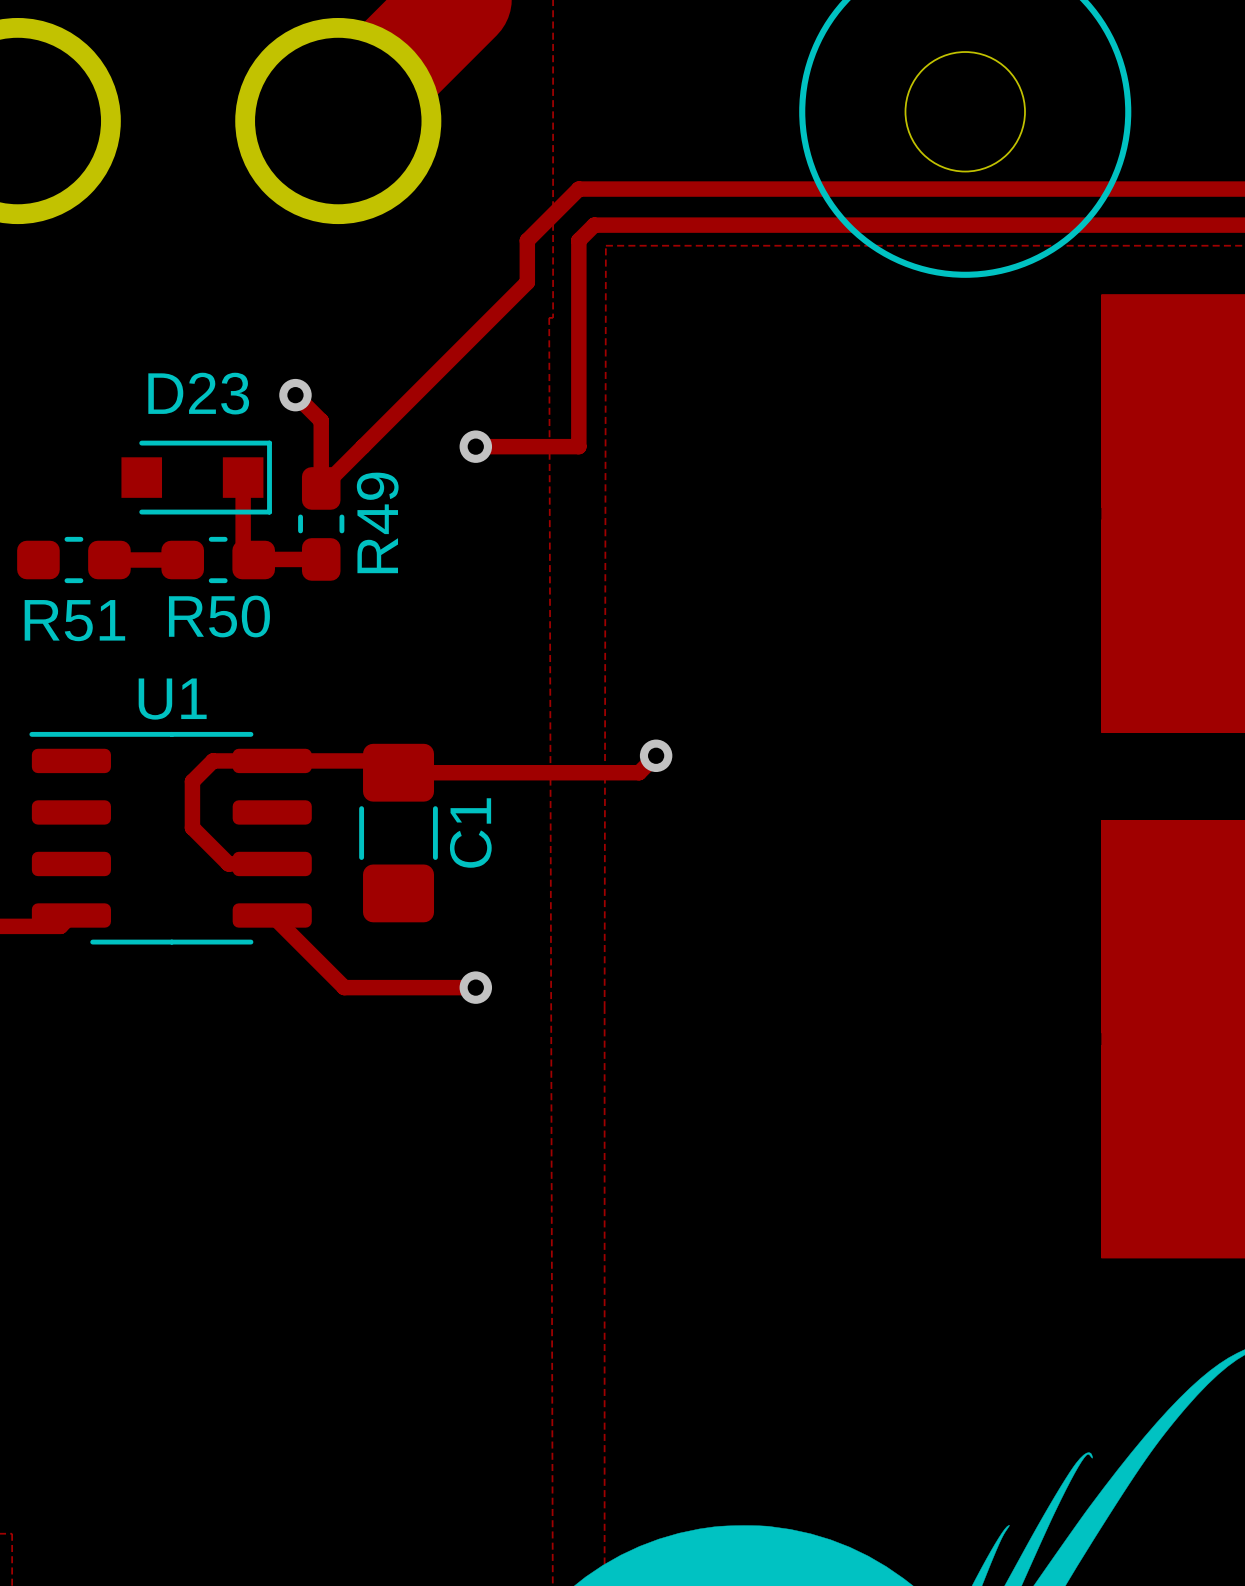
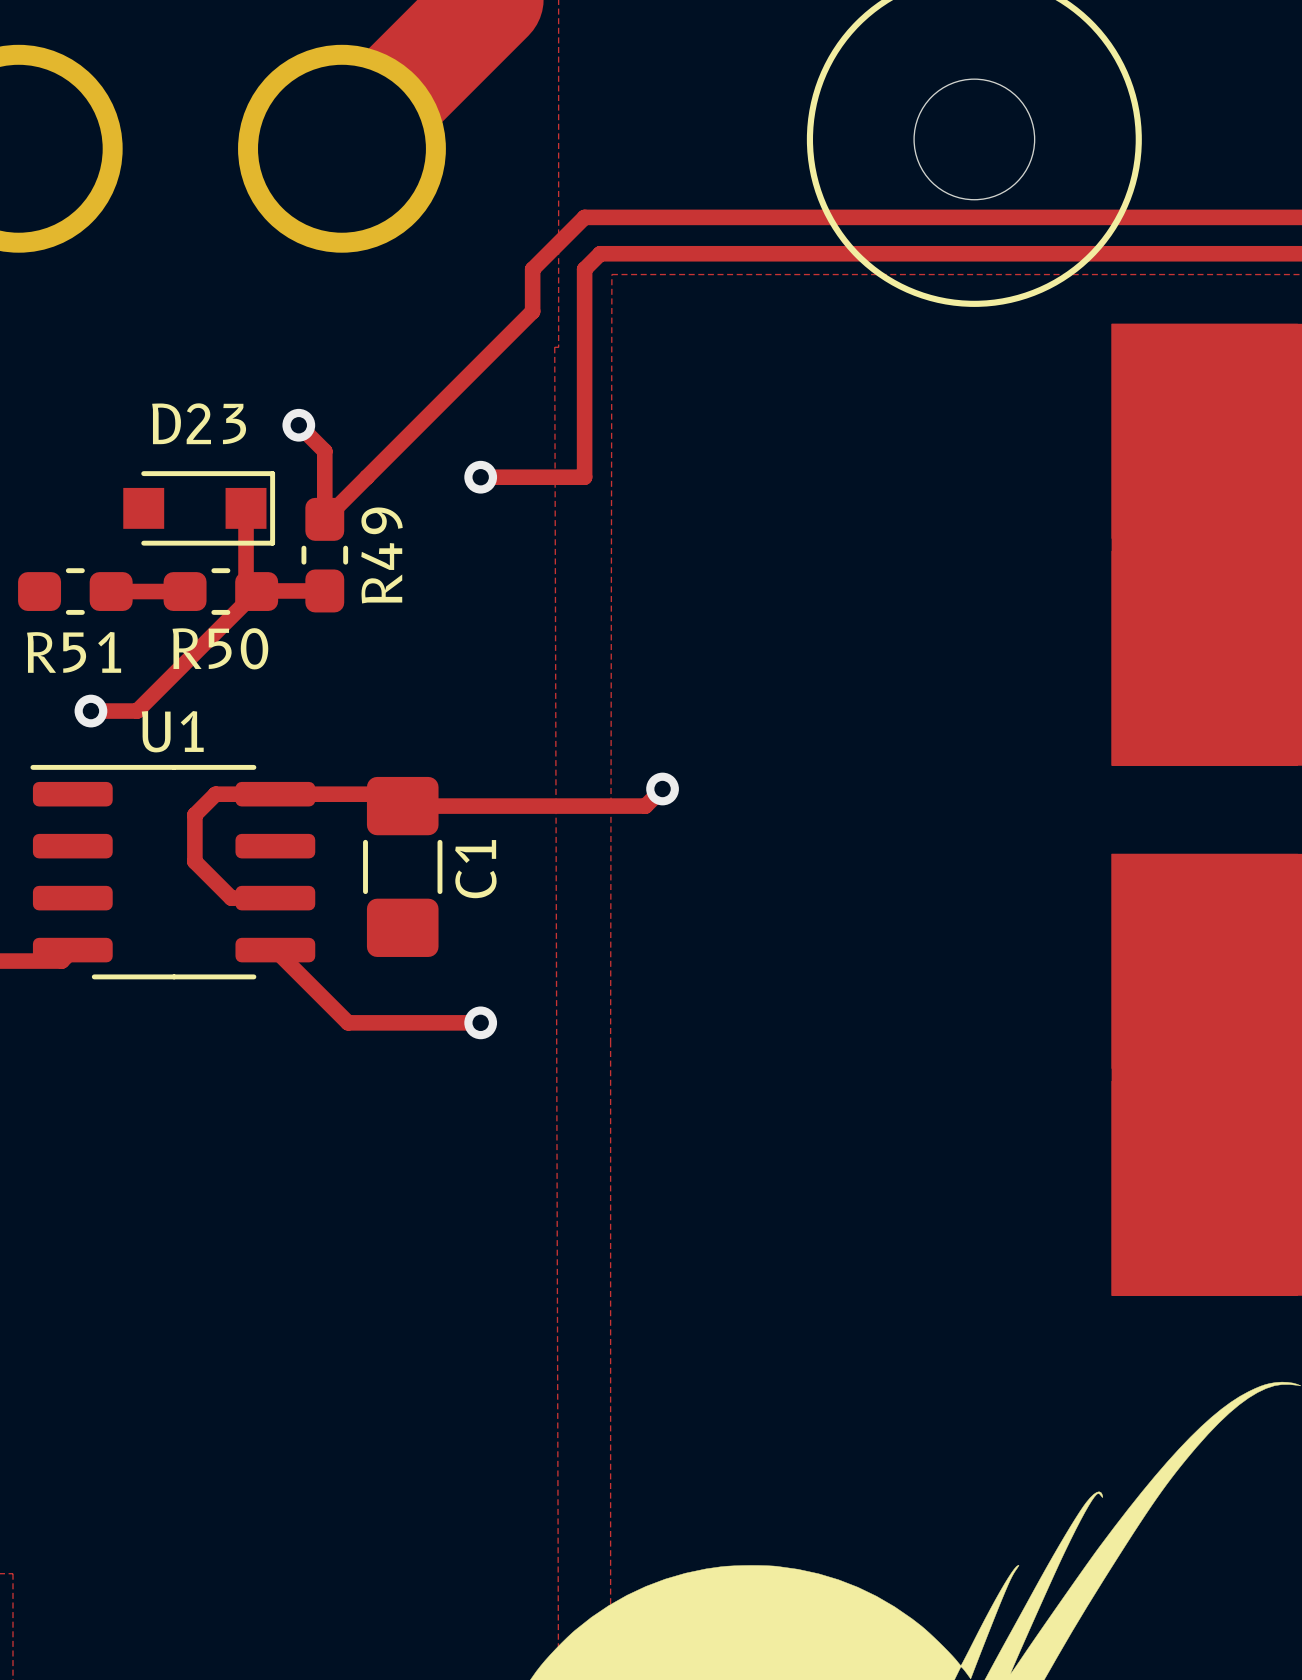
track: none -> (256, 591) (137, 711) (90, 711)
via: none -> (90, 711)

